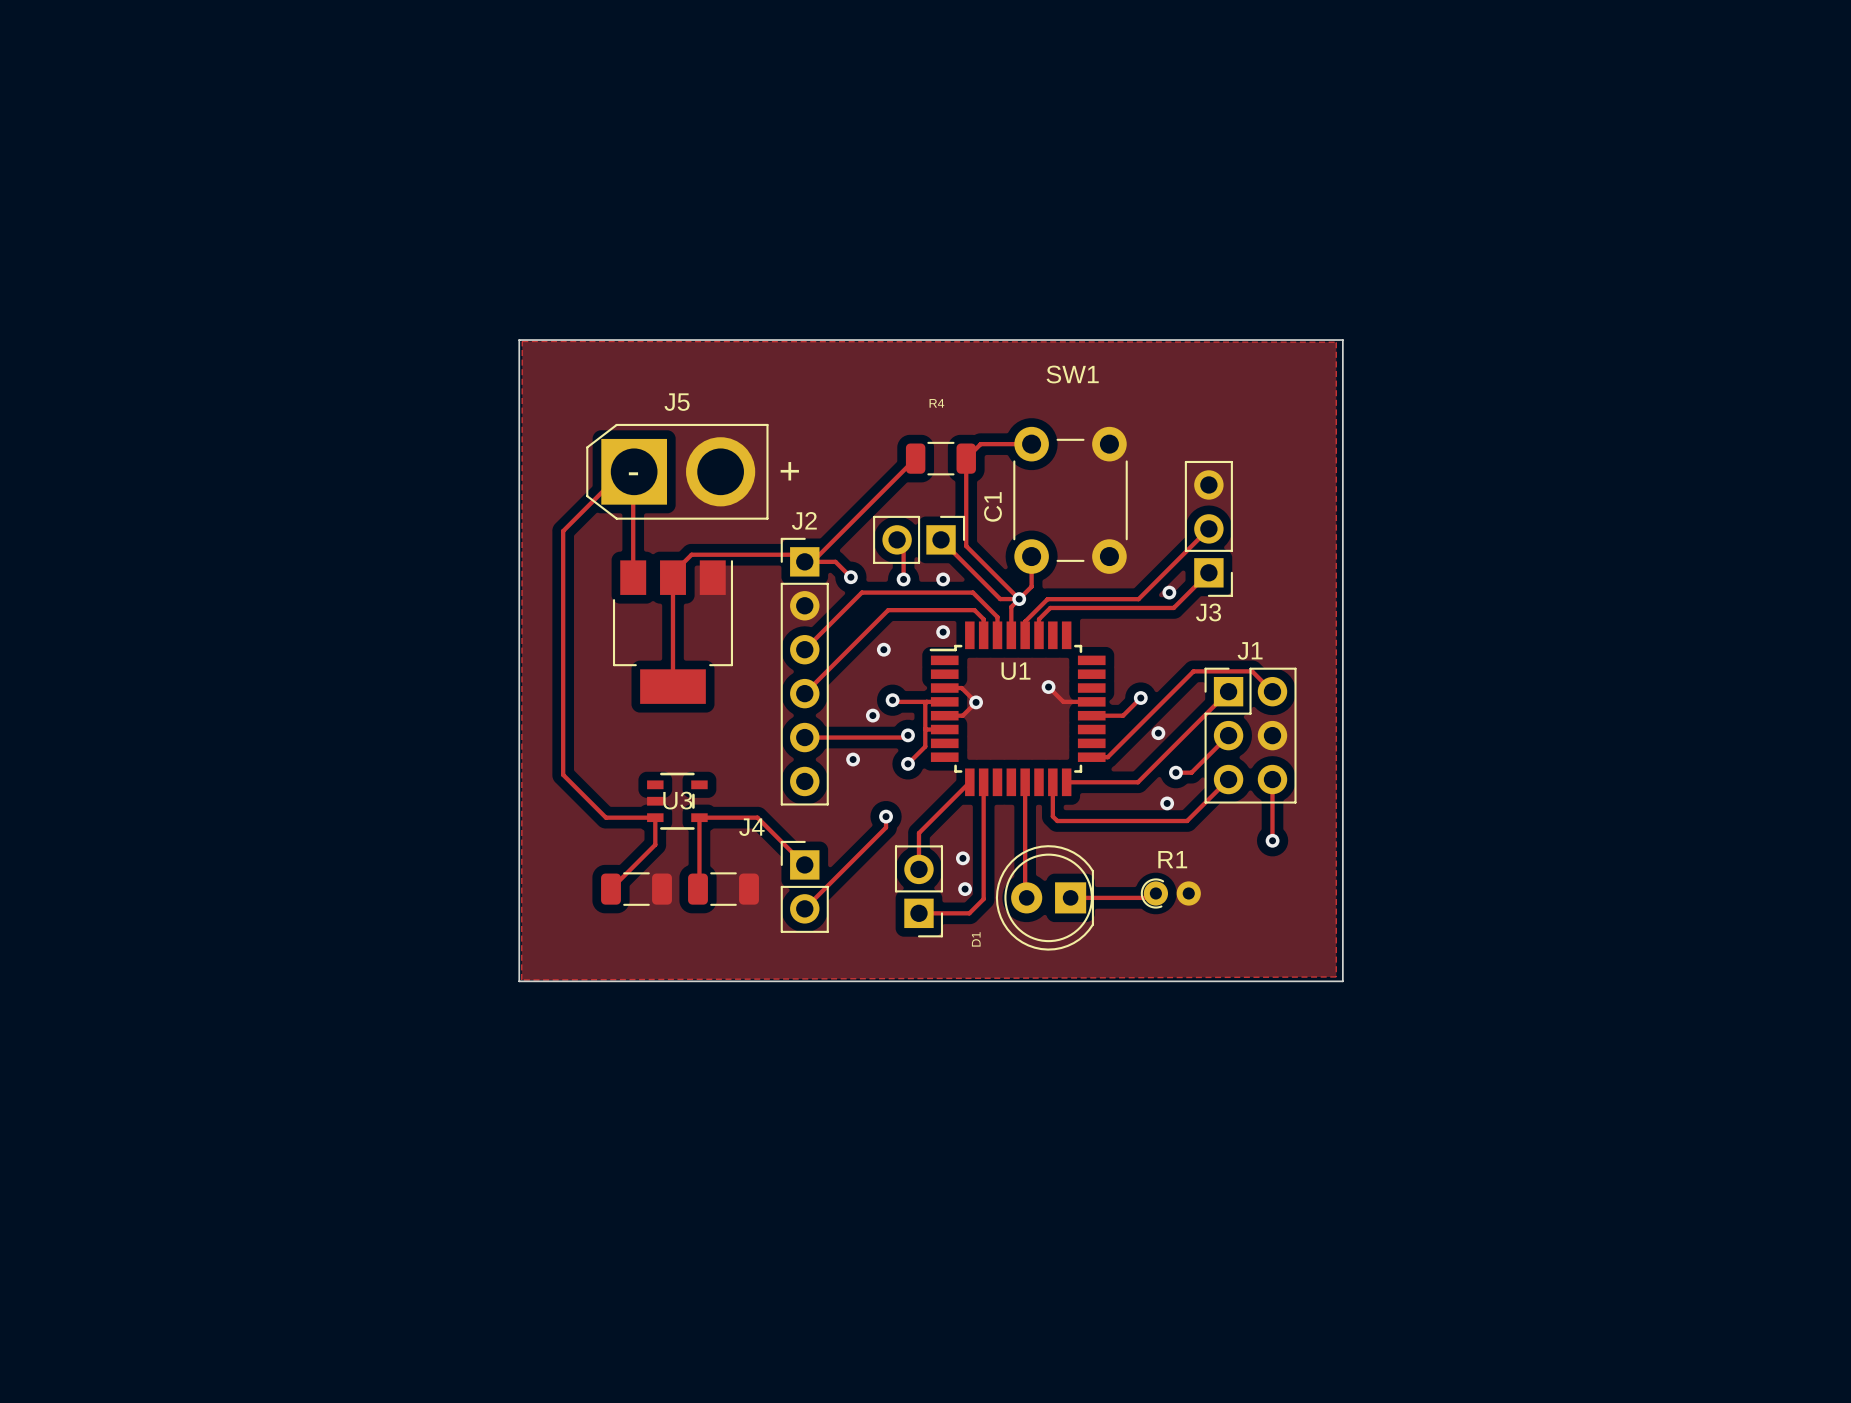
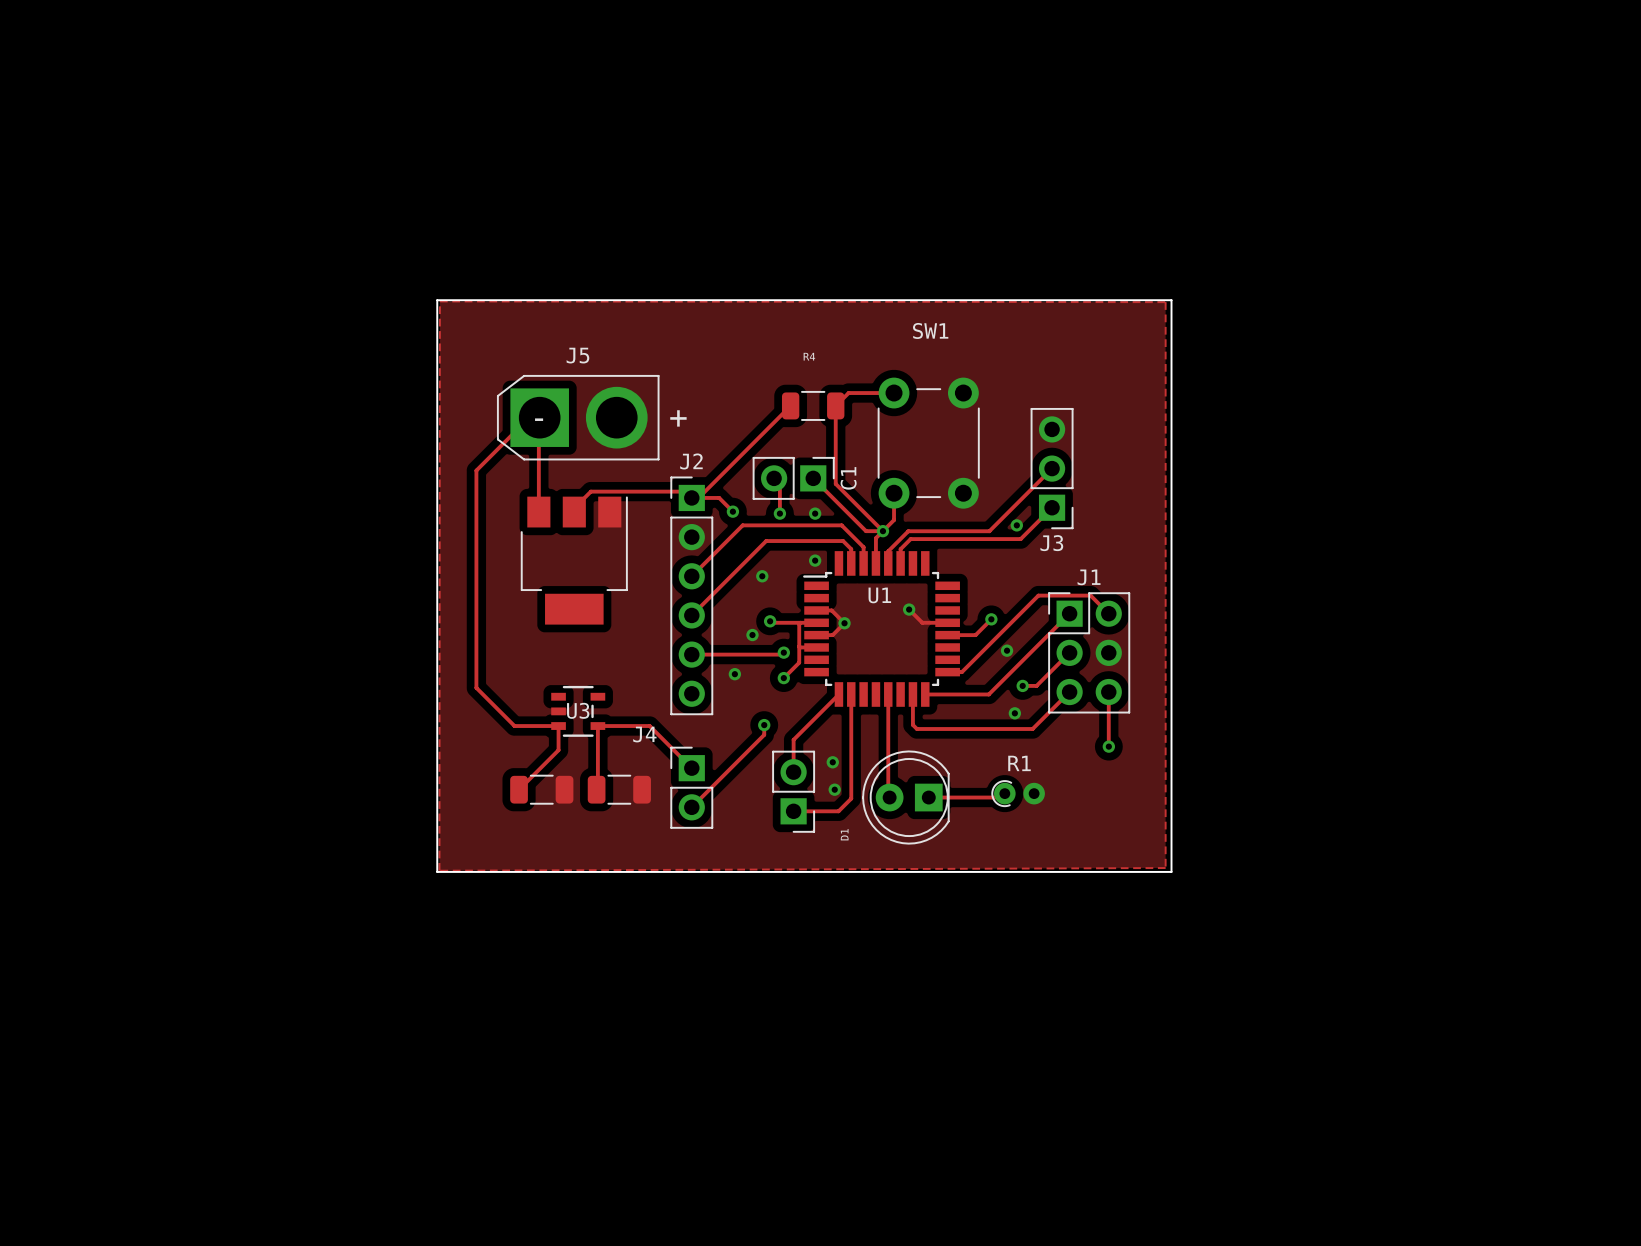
C1 name position: C1 (993, 506) -> C1 (848, 478)
track: (672, 577) (672, 686) -> none

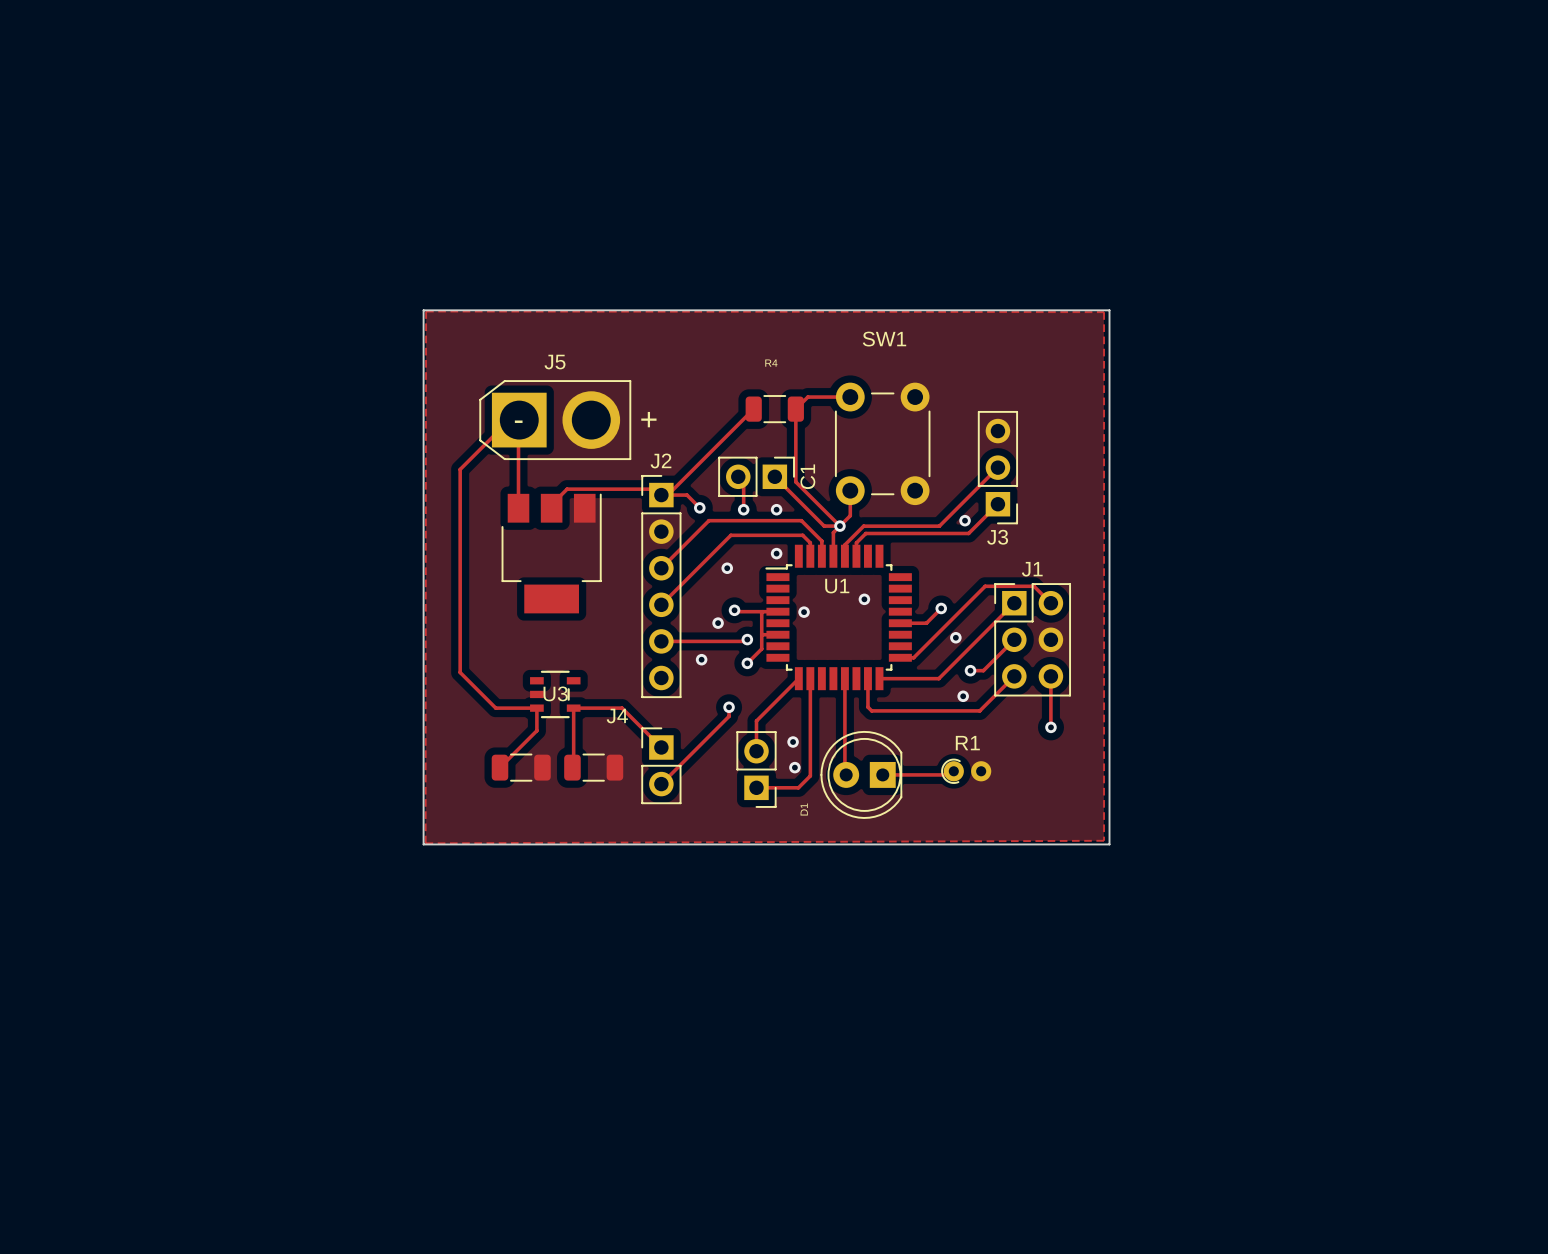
track: (909, 609) (922, 622) (947, 622) -> none
track: (816, 610) (831, 610) (844, 623) (832, 635) (816, 635) -> none

